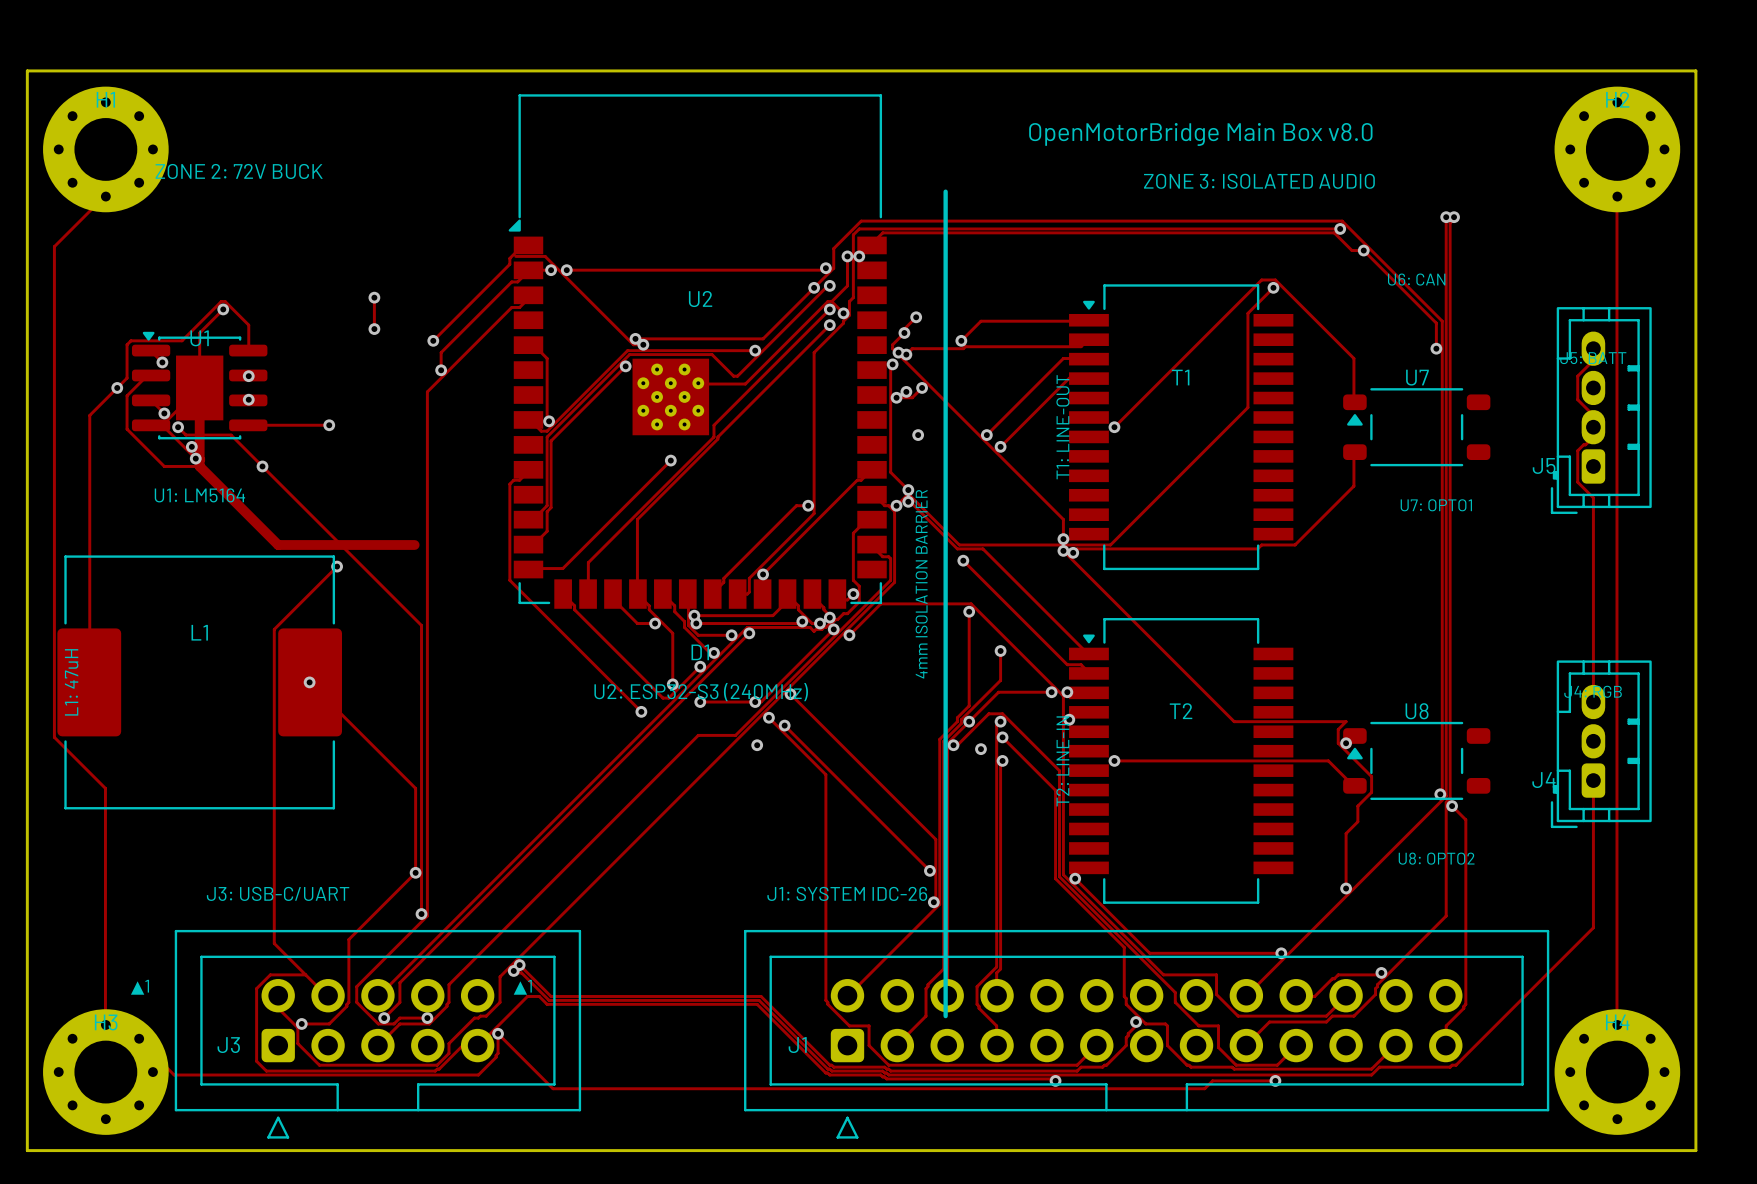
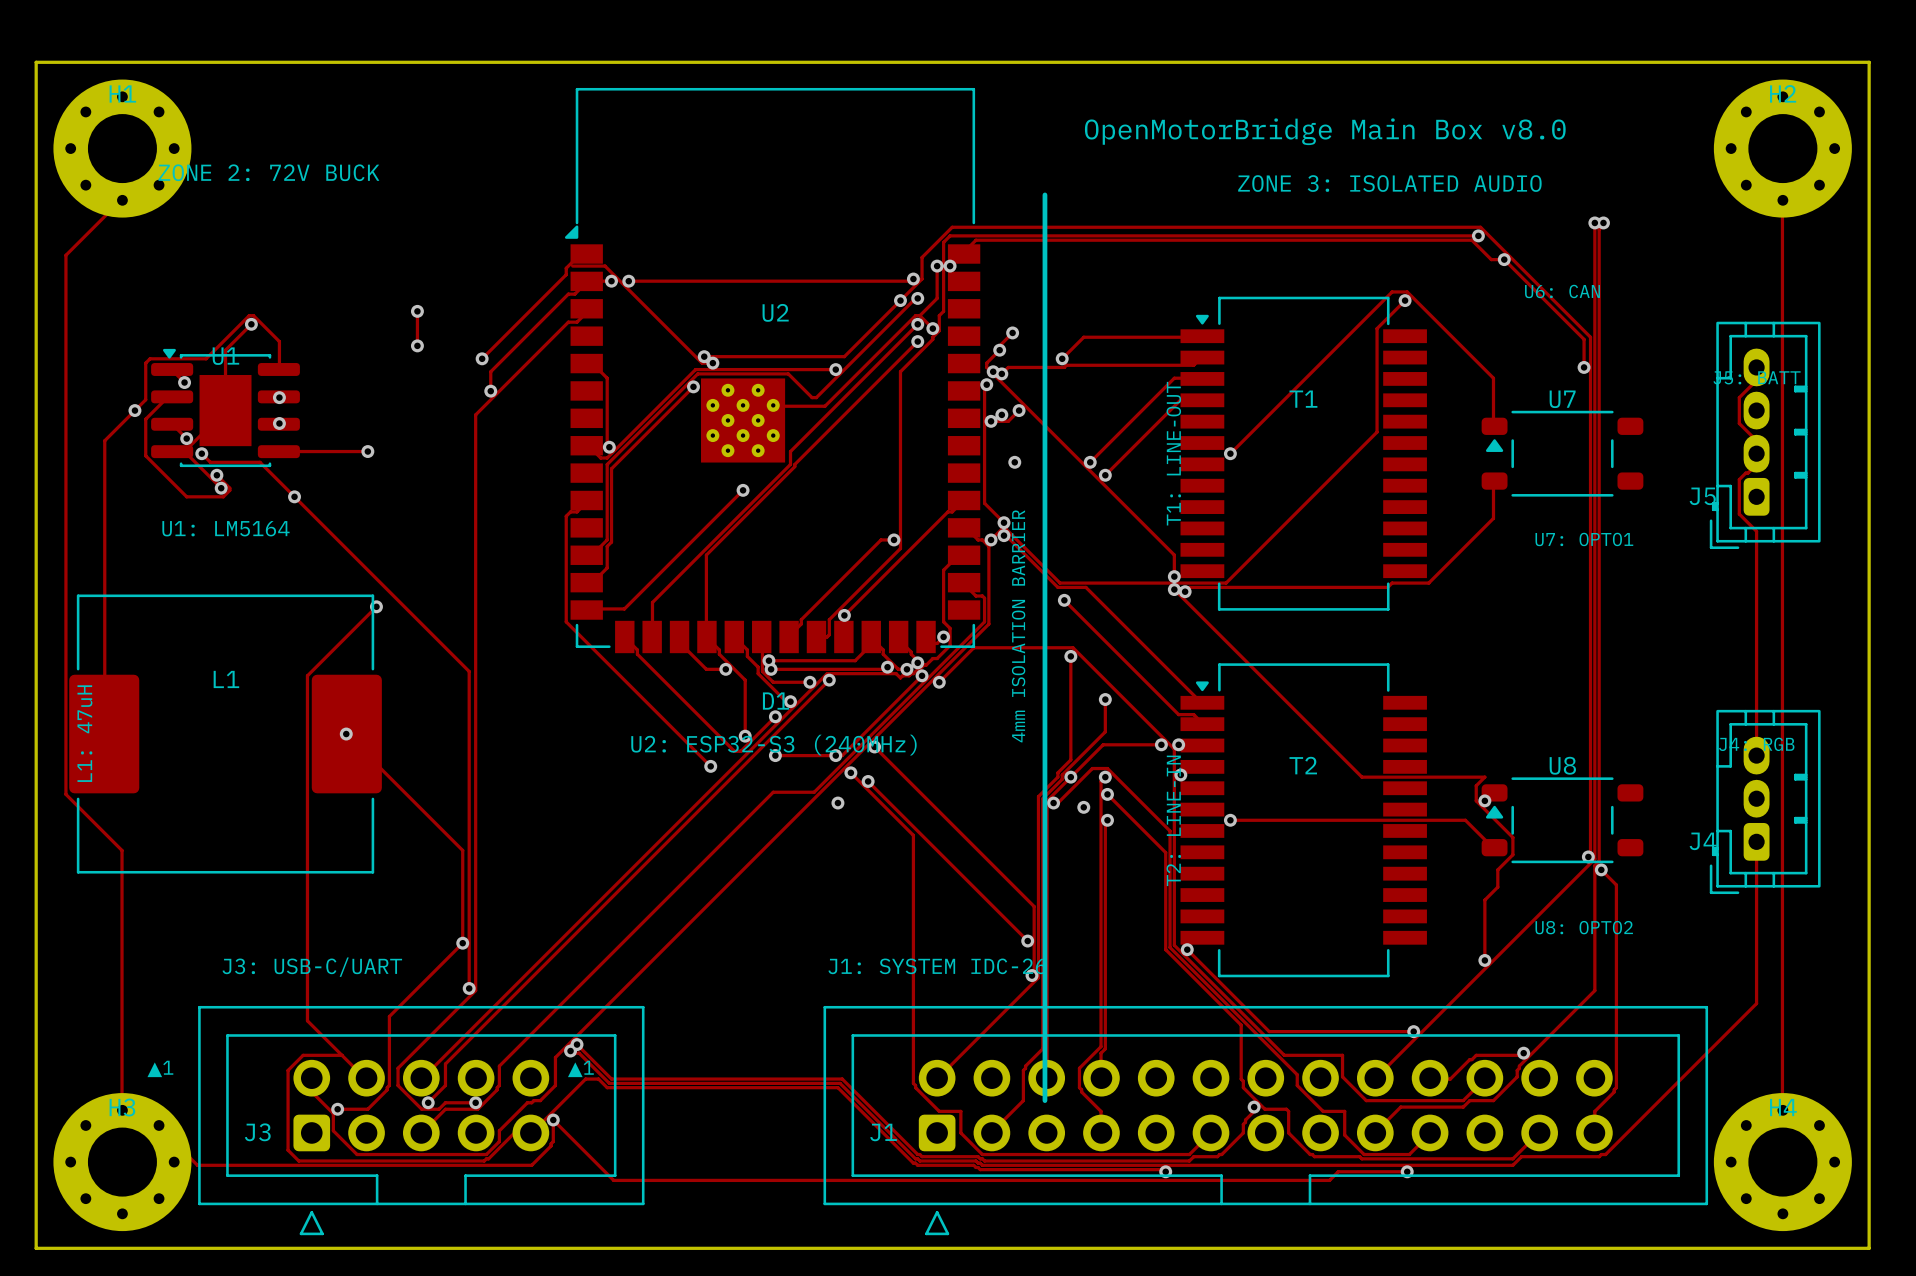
track: (199, 387) (199, 466) (278, 544) (414, 544) -> none

